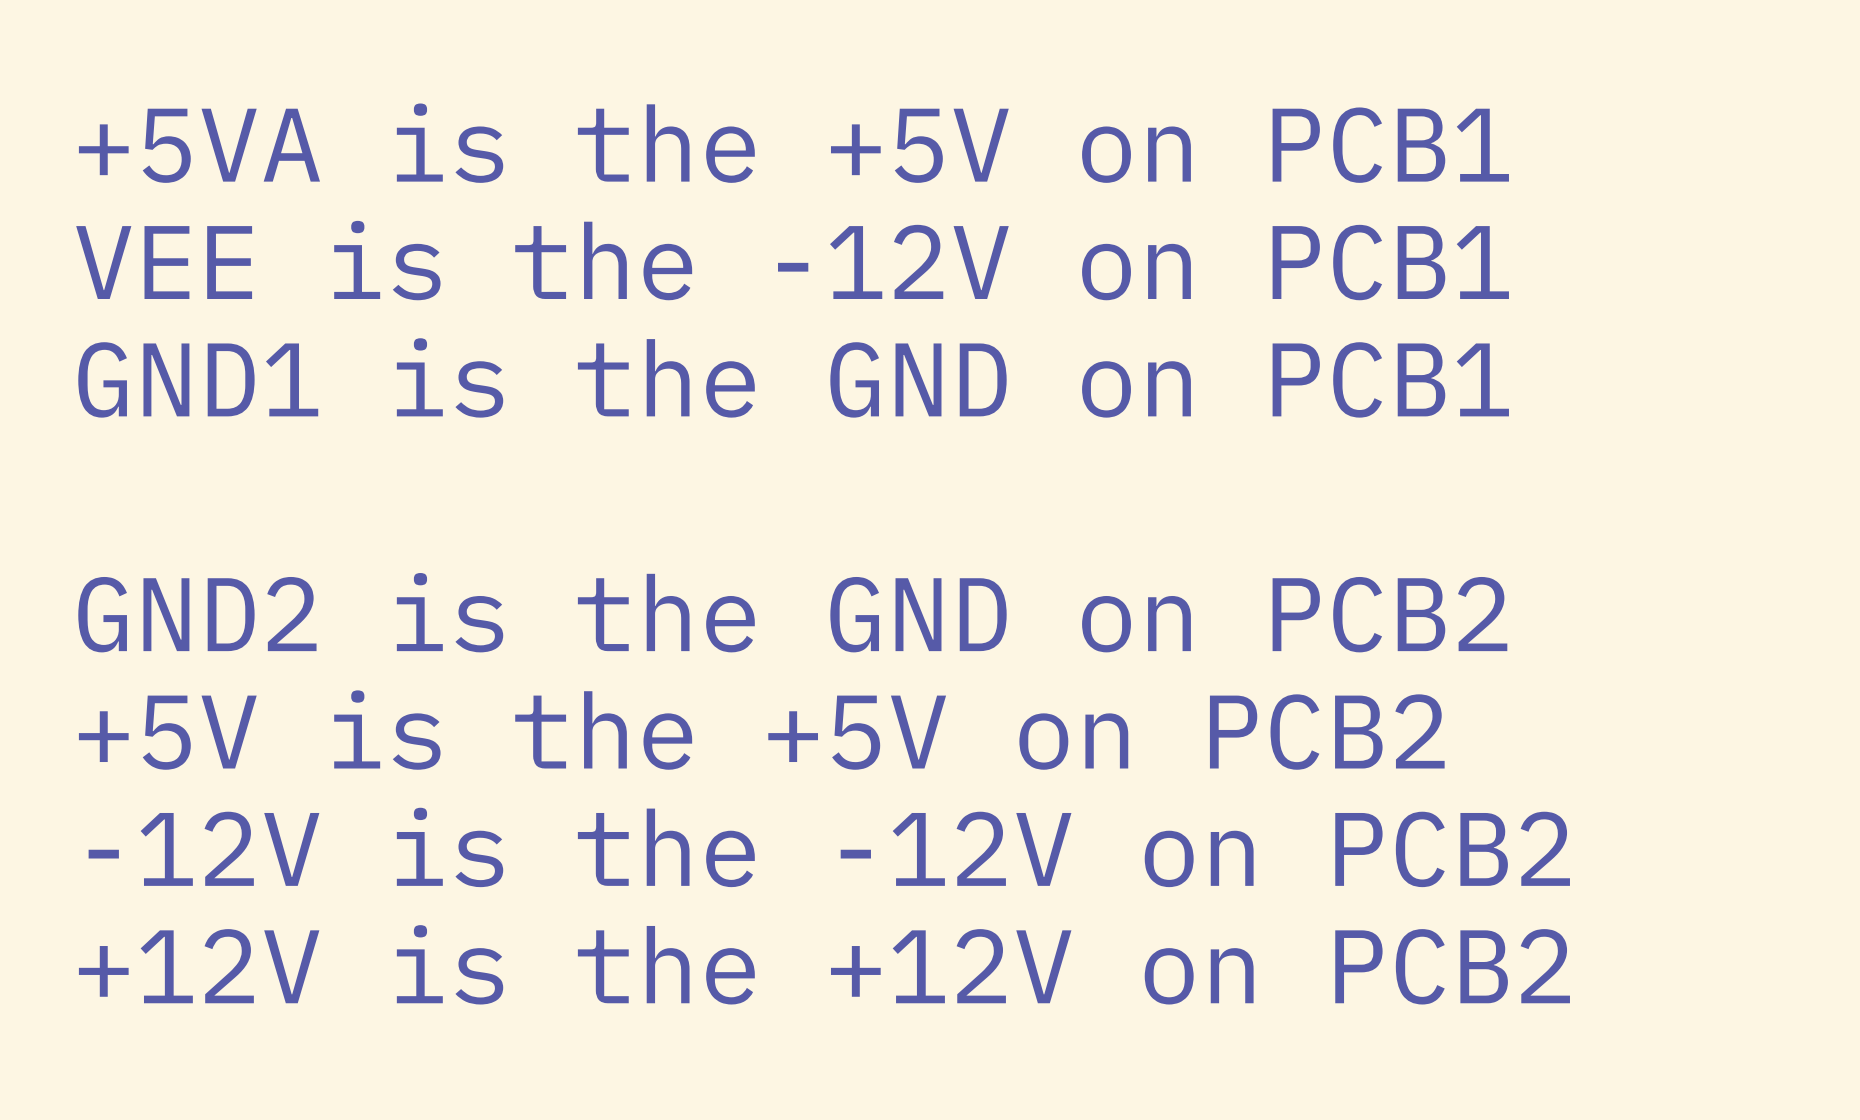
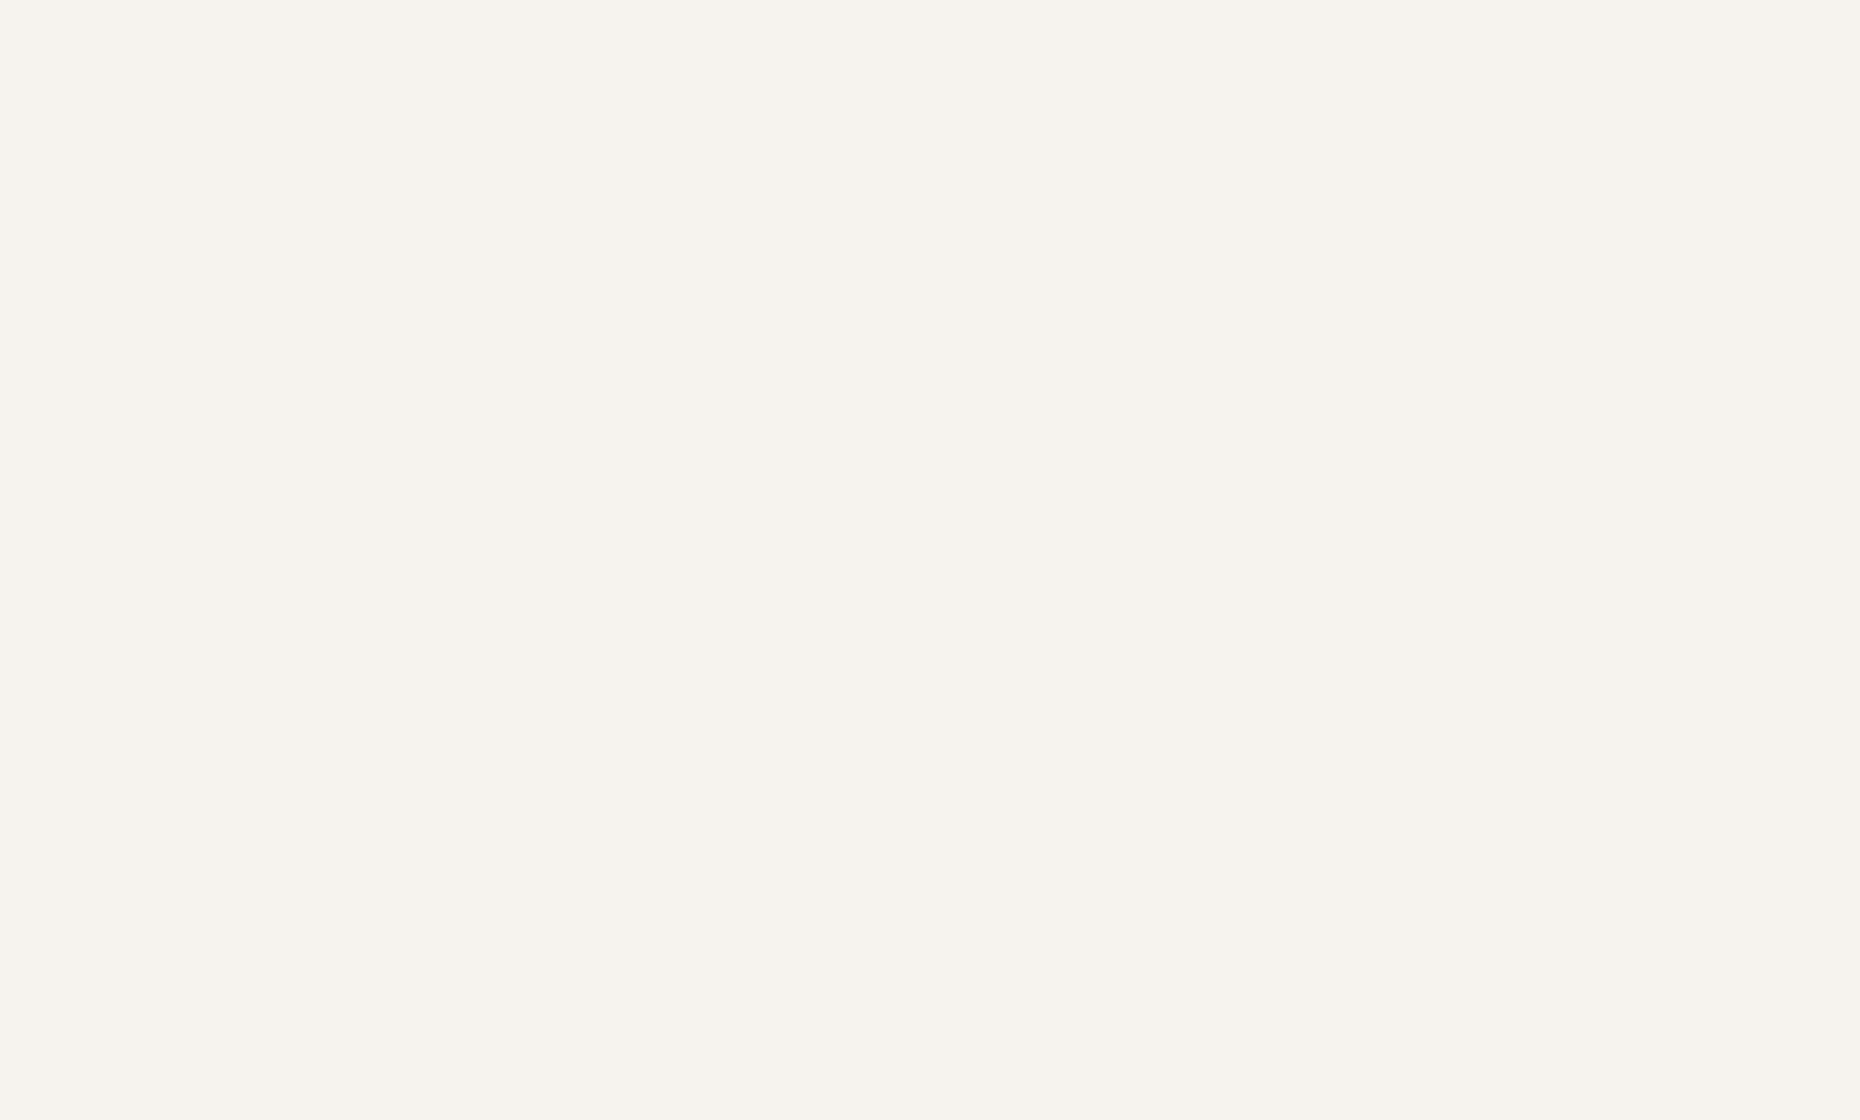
text: +5VA is the +5V on PCB1 (793, 143) -> none
text: VEE is the -12V on PCB1 (792, 260) -> none
text: GND1 is the GND on PCB1 (793, 377) -> none
text: GND2 is the GND on PCB2 (792, 612) -> none
text: +5V is the +5V on PCB2 (761, 730) -> none
text: -12V is the -12V on PCB2 (829, 847) -> none
text: +12V is the +12V on PCB2 (824, 964) -> none

